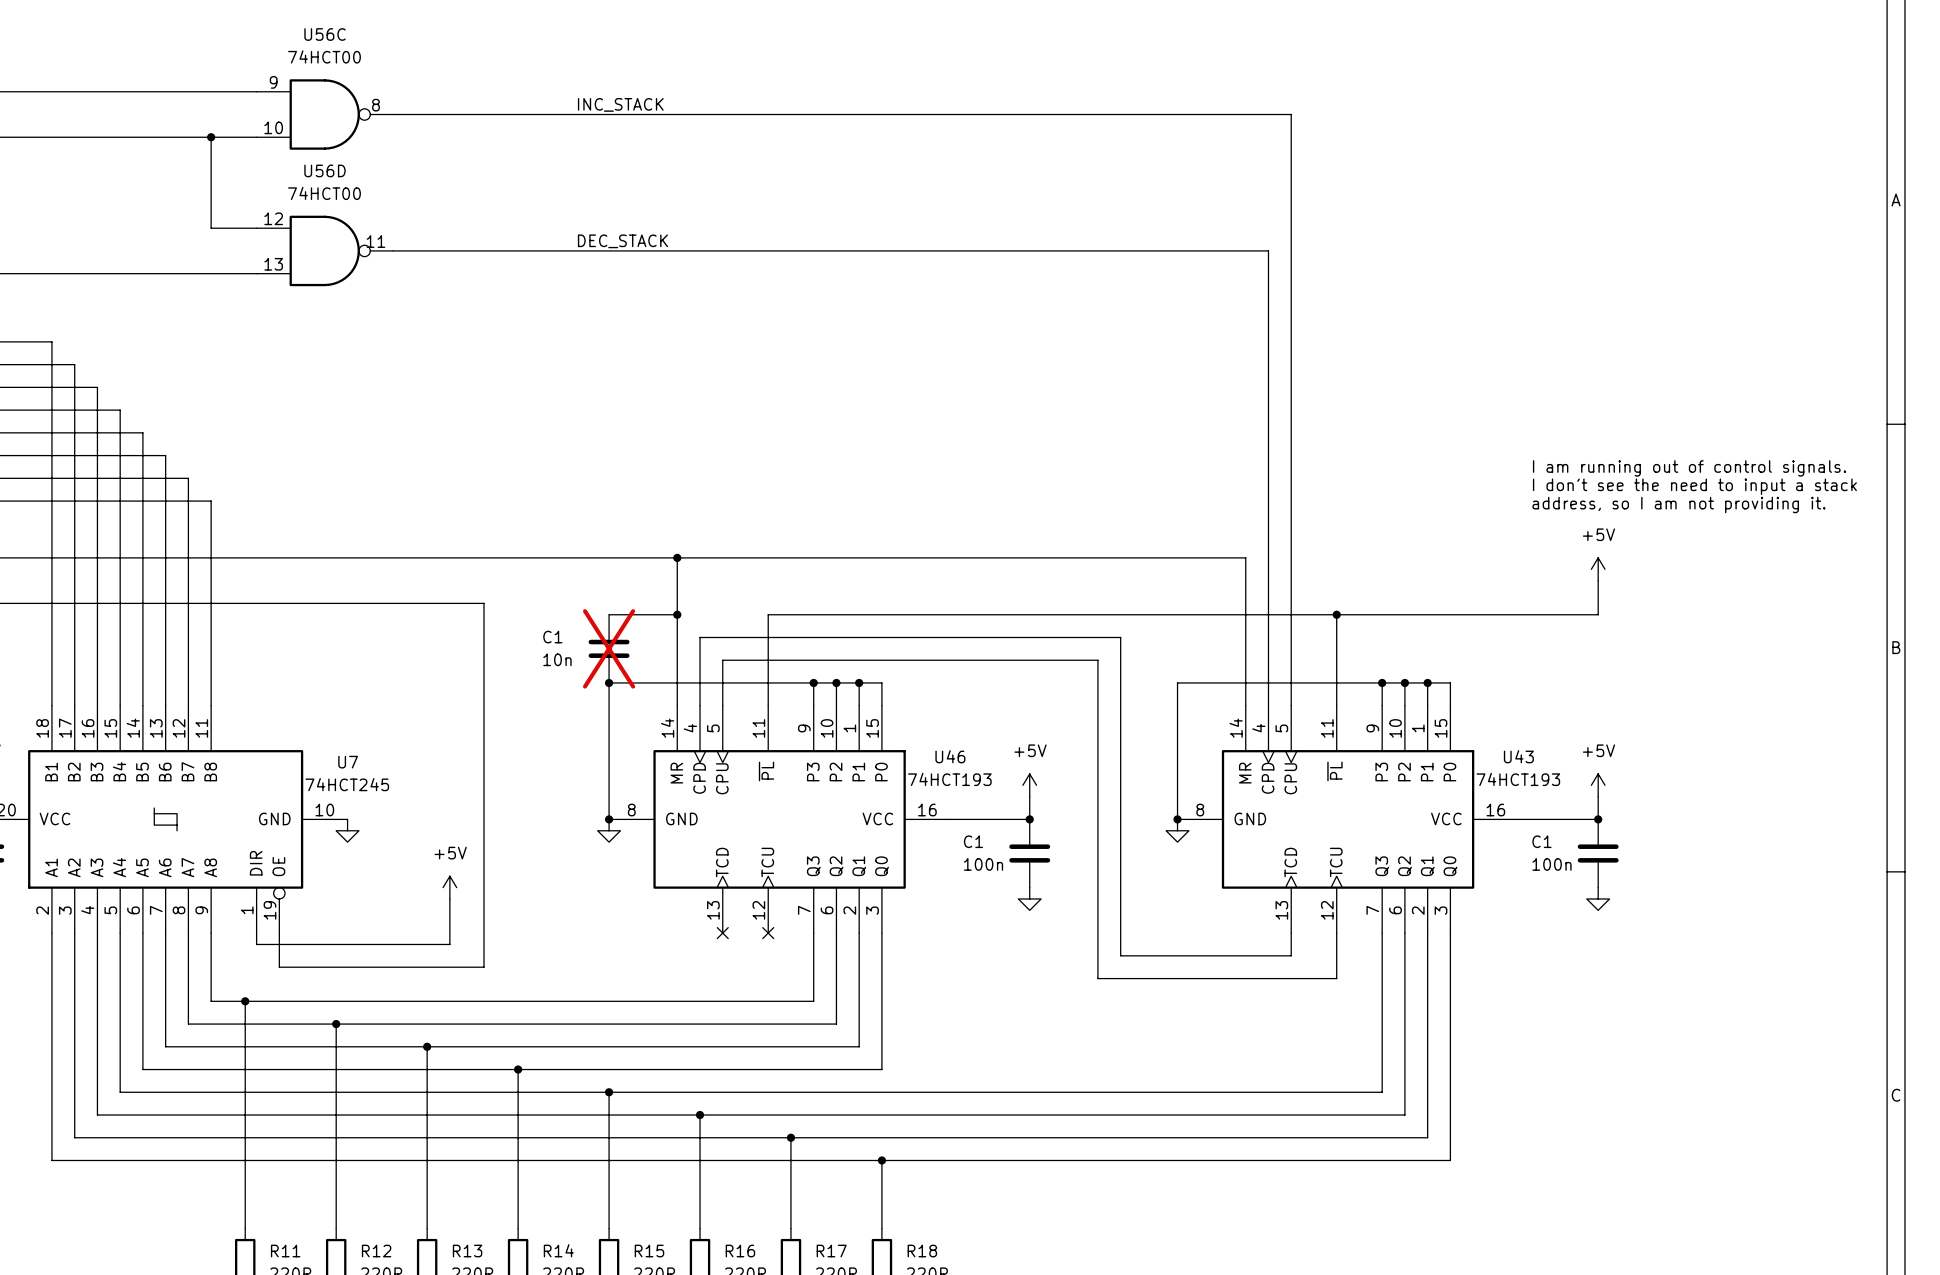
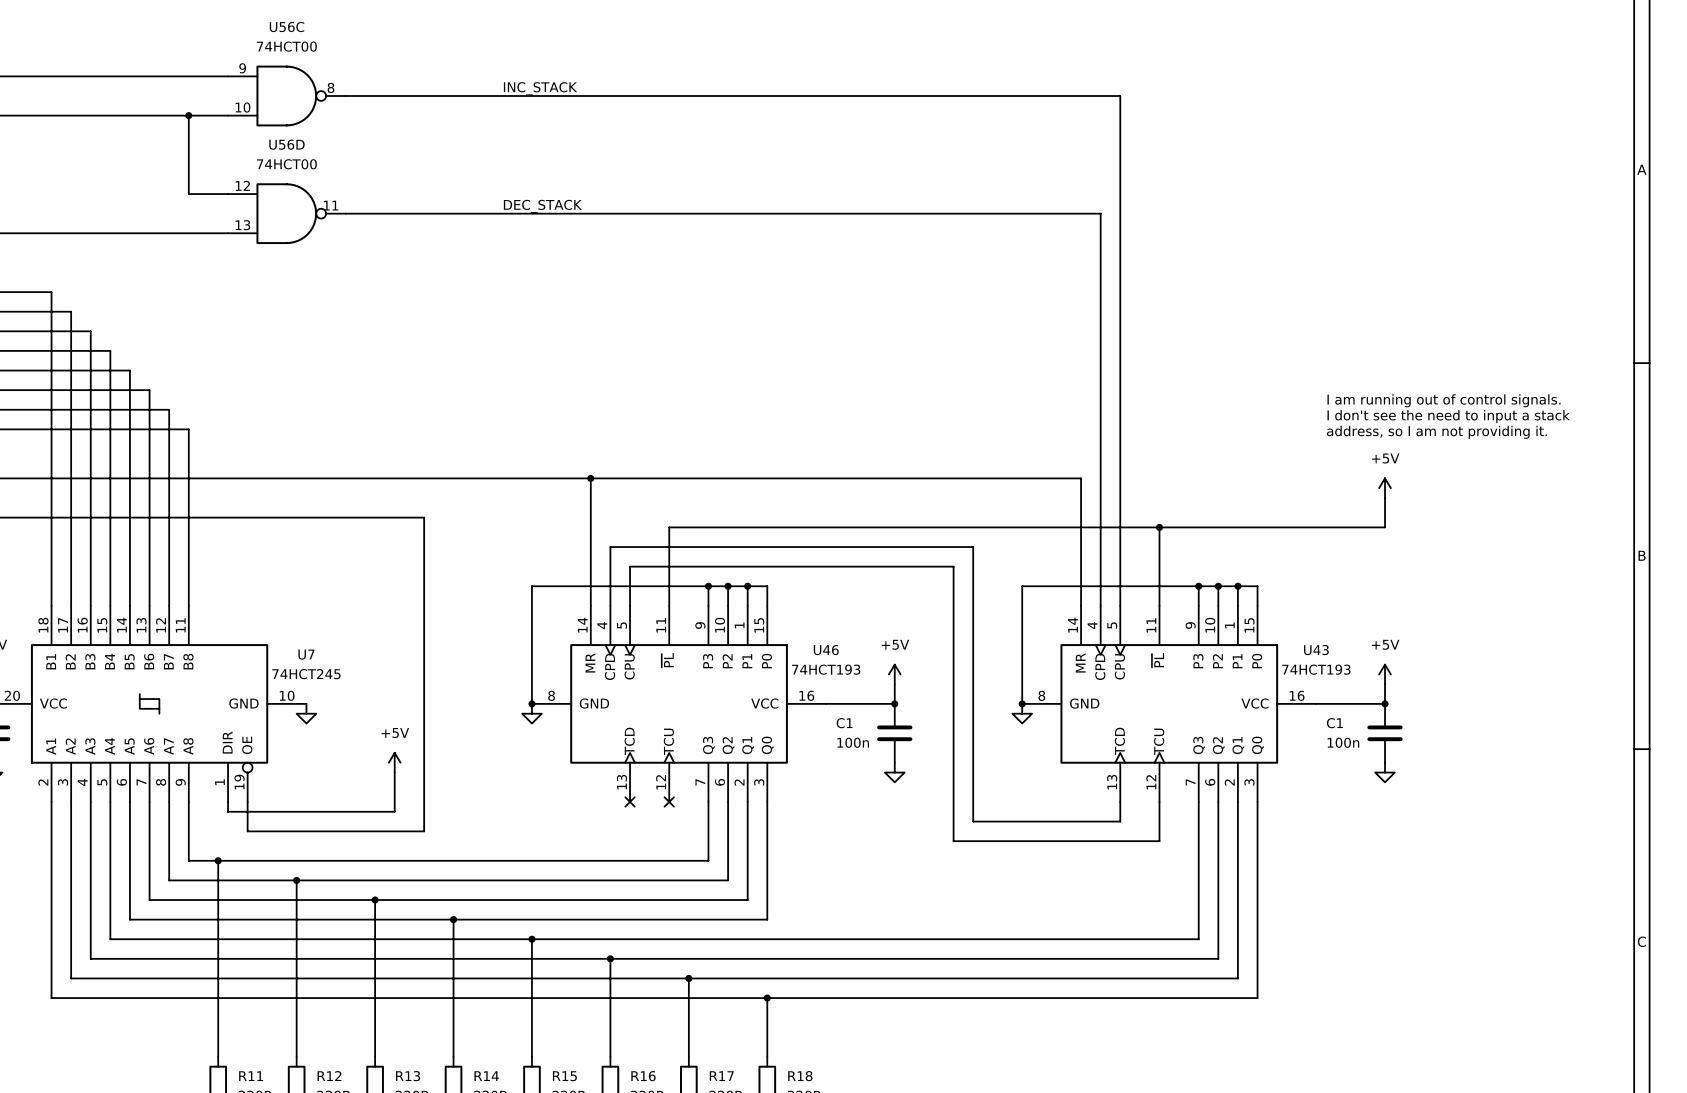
wire: (609, 614) (677, 614) -> none
junction: (677, 614) -> none
C1: 10n (609, 648) -> none
junction: (609, 682) -> none

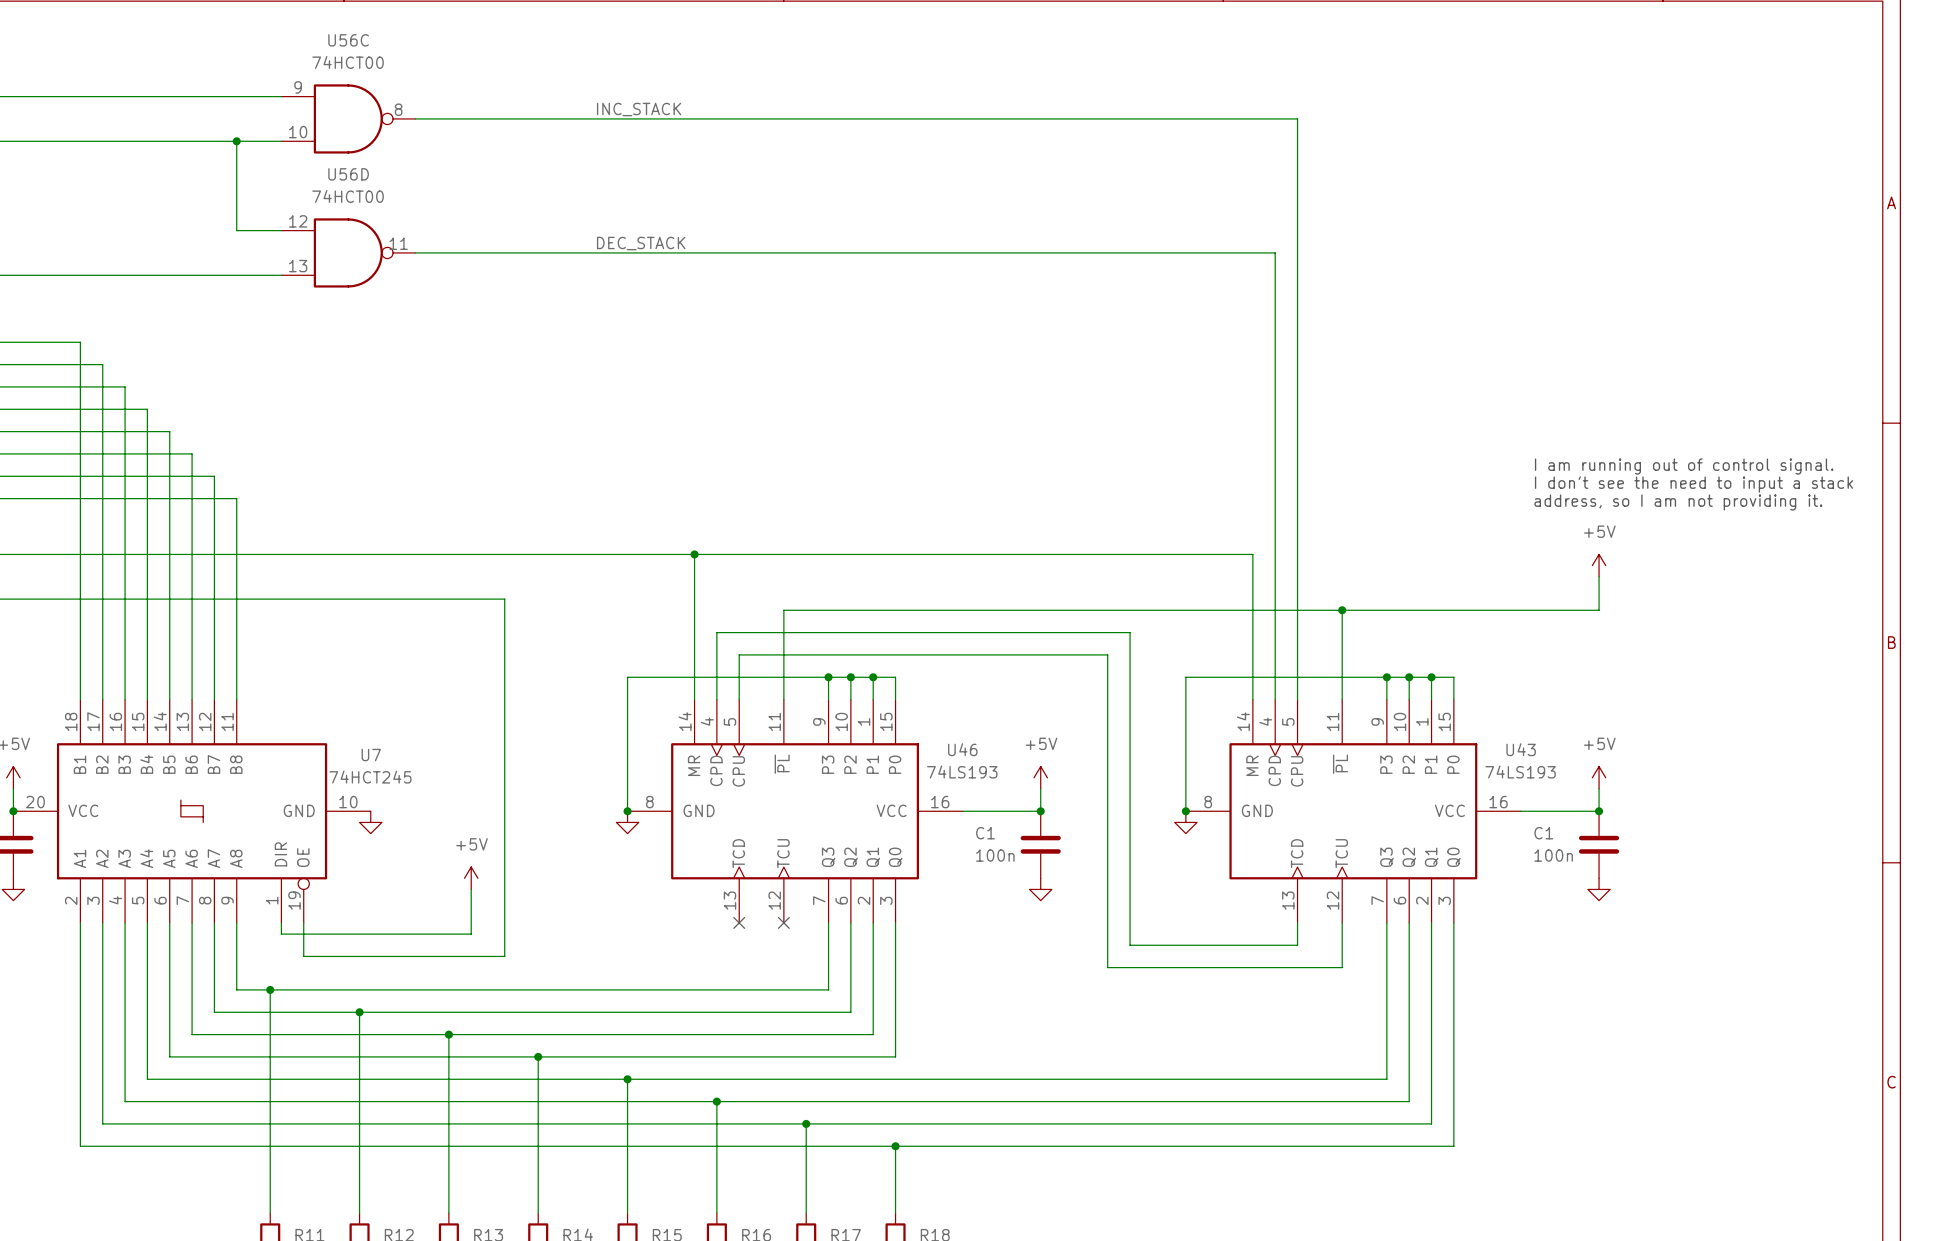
text: I am running out of control signals. (1444, 400) -> I am running out of control signal. (1684, 466)
U46 value: 74HCT193 (826, 669) -> 74LS193 (962, 772)
U43 value: 74HCT193 (1316, 669) -> 74LS193 (1520, 772)

